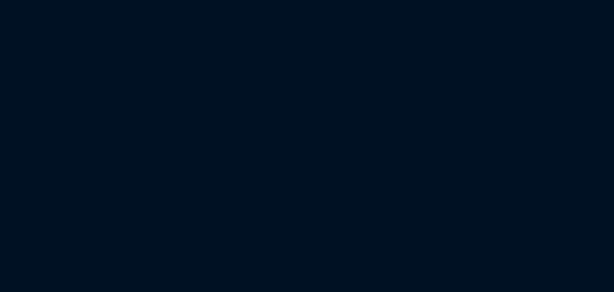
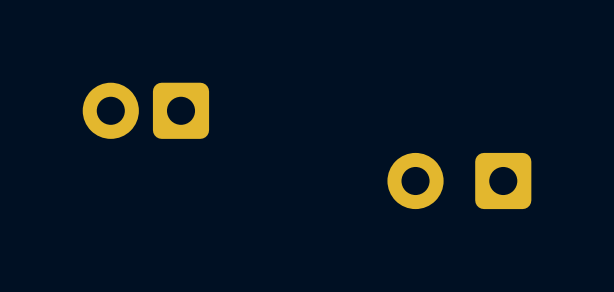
part: none -> (145, 110)
part: none -> (459, 181)

